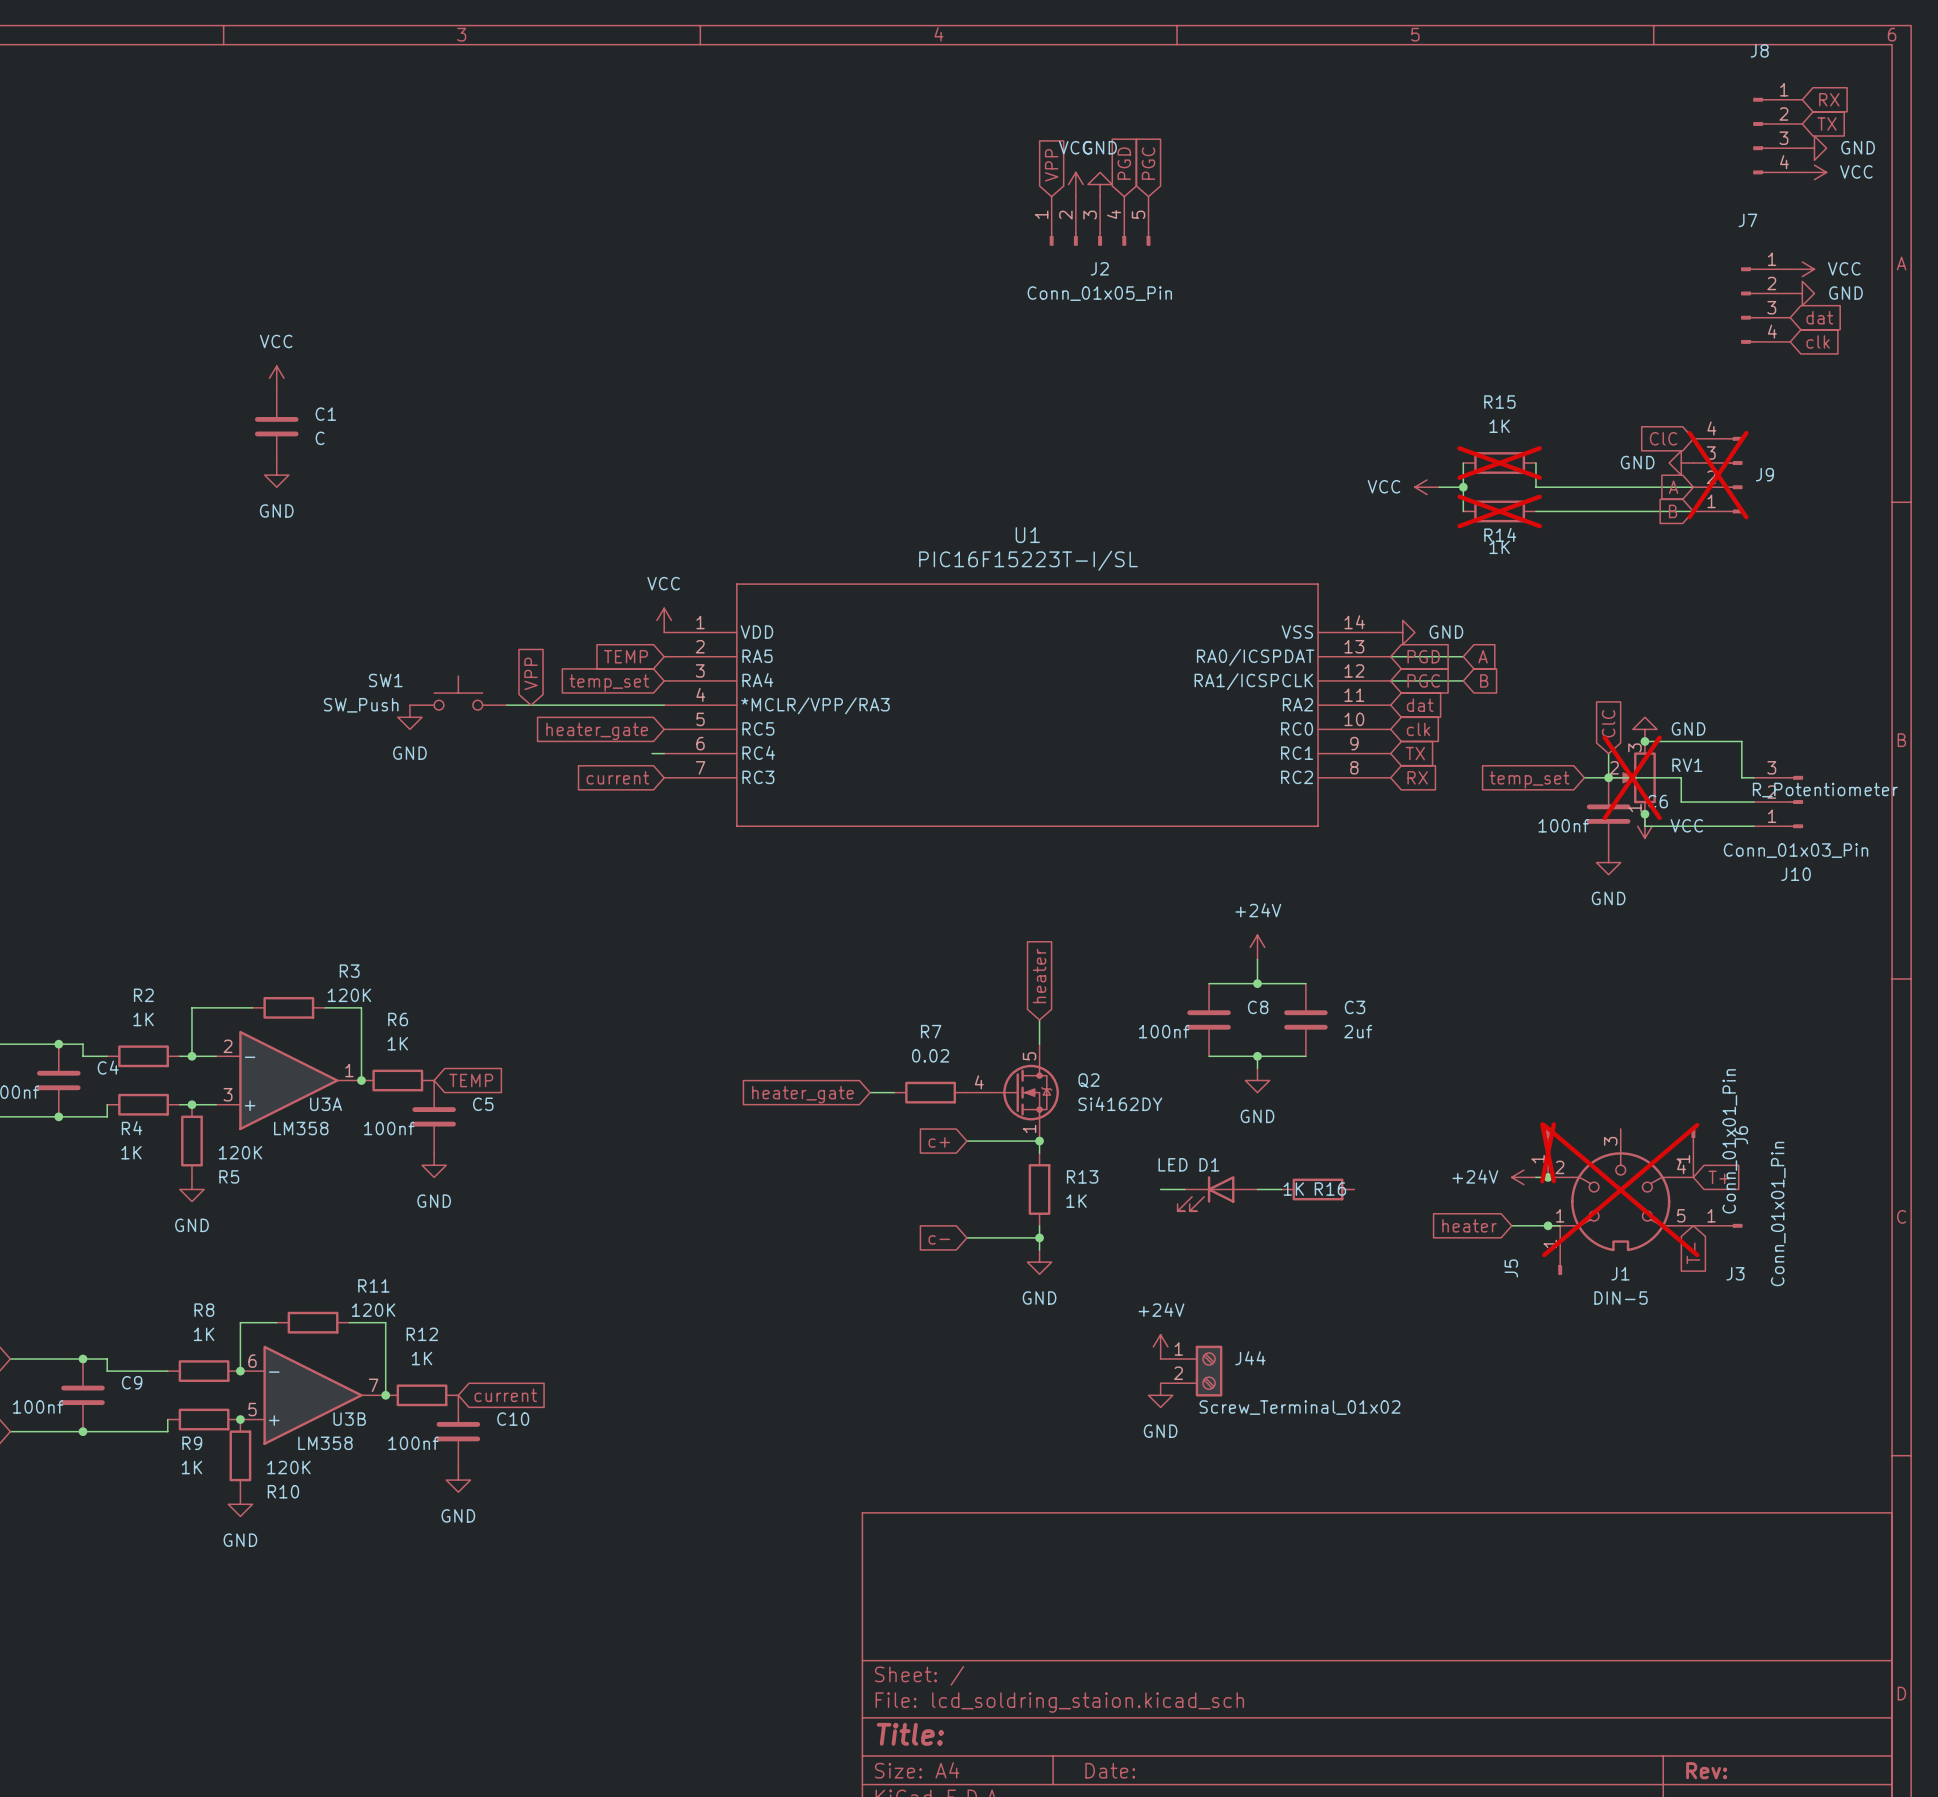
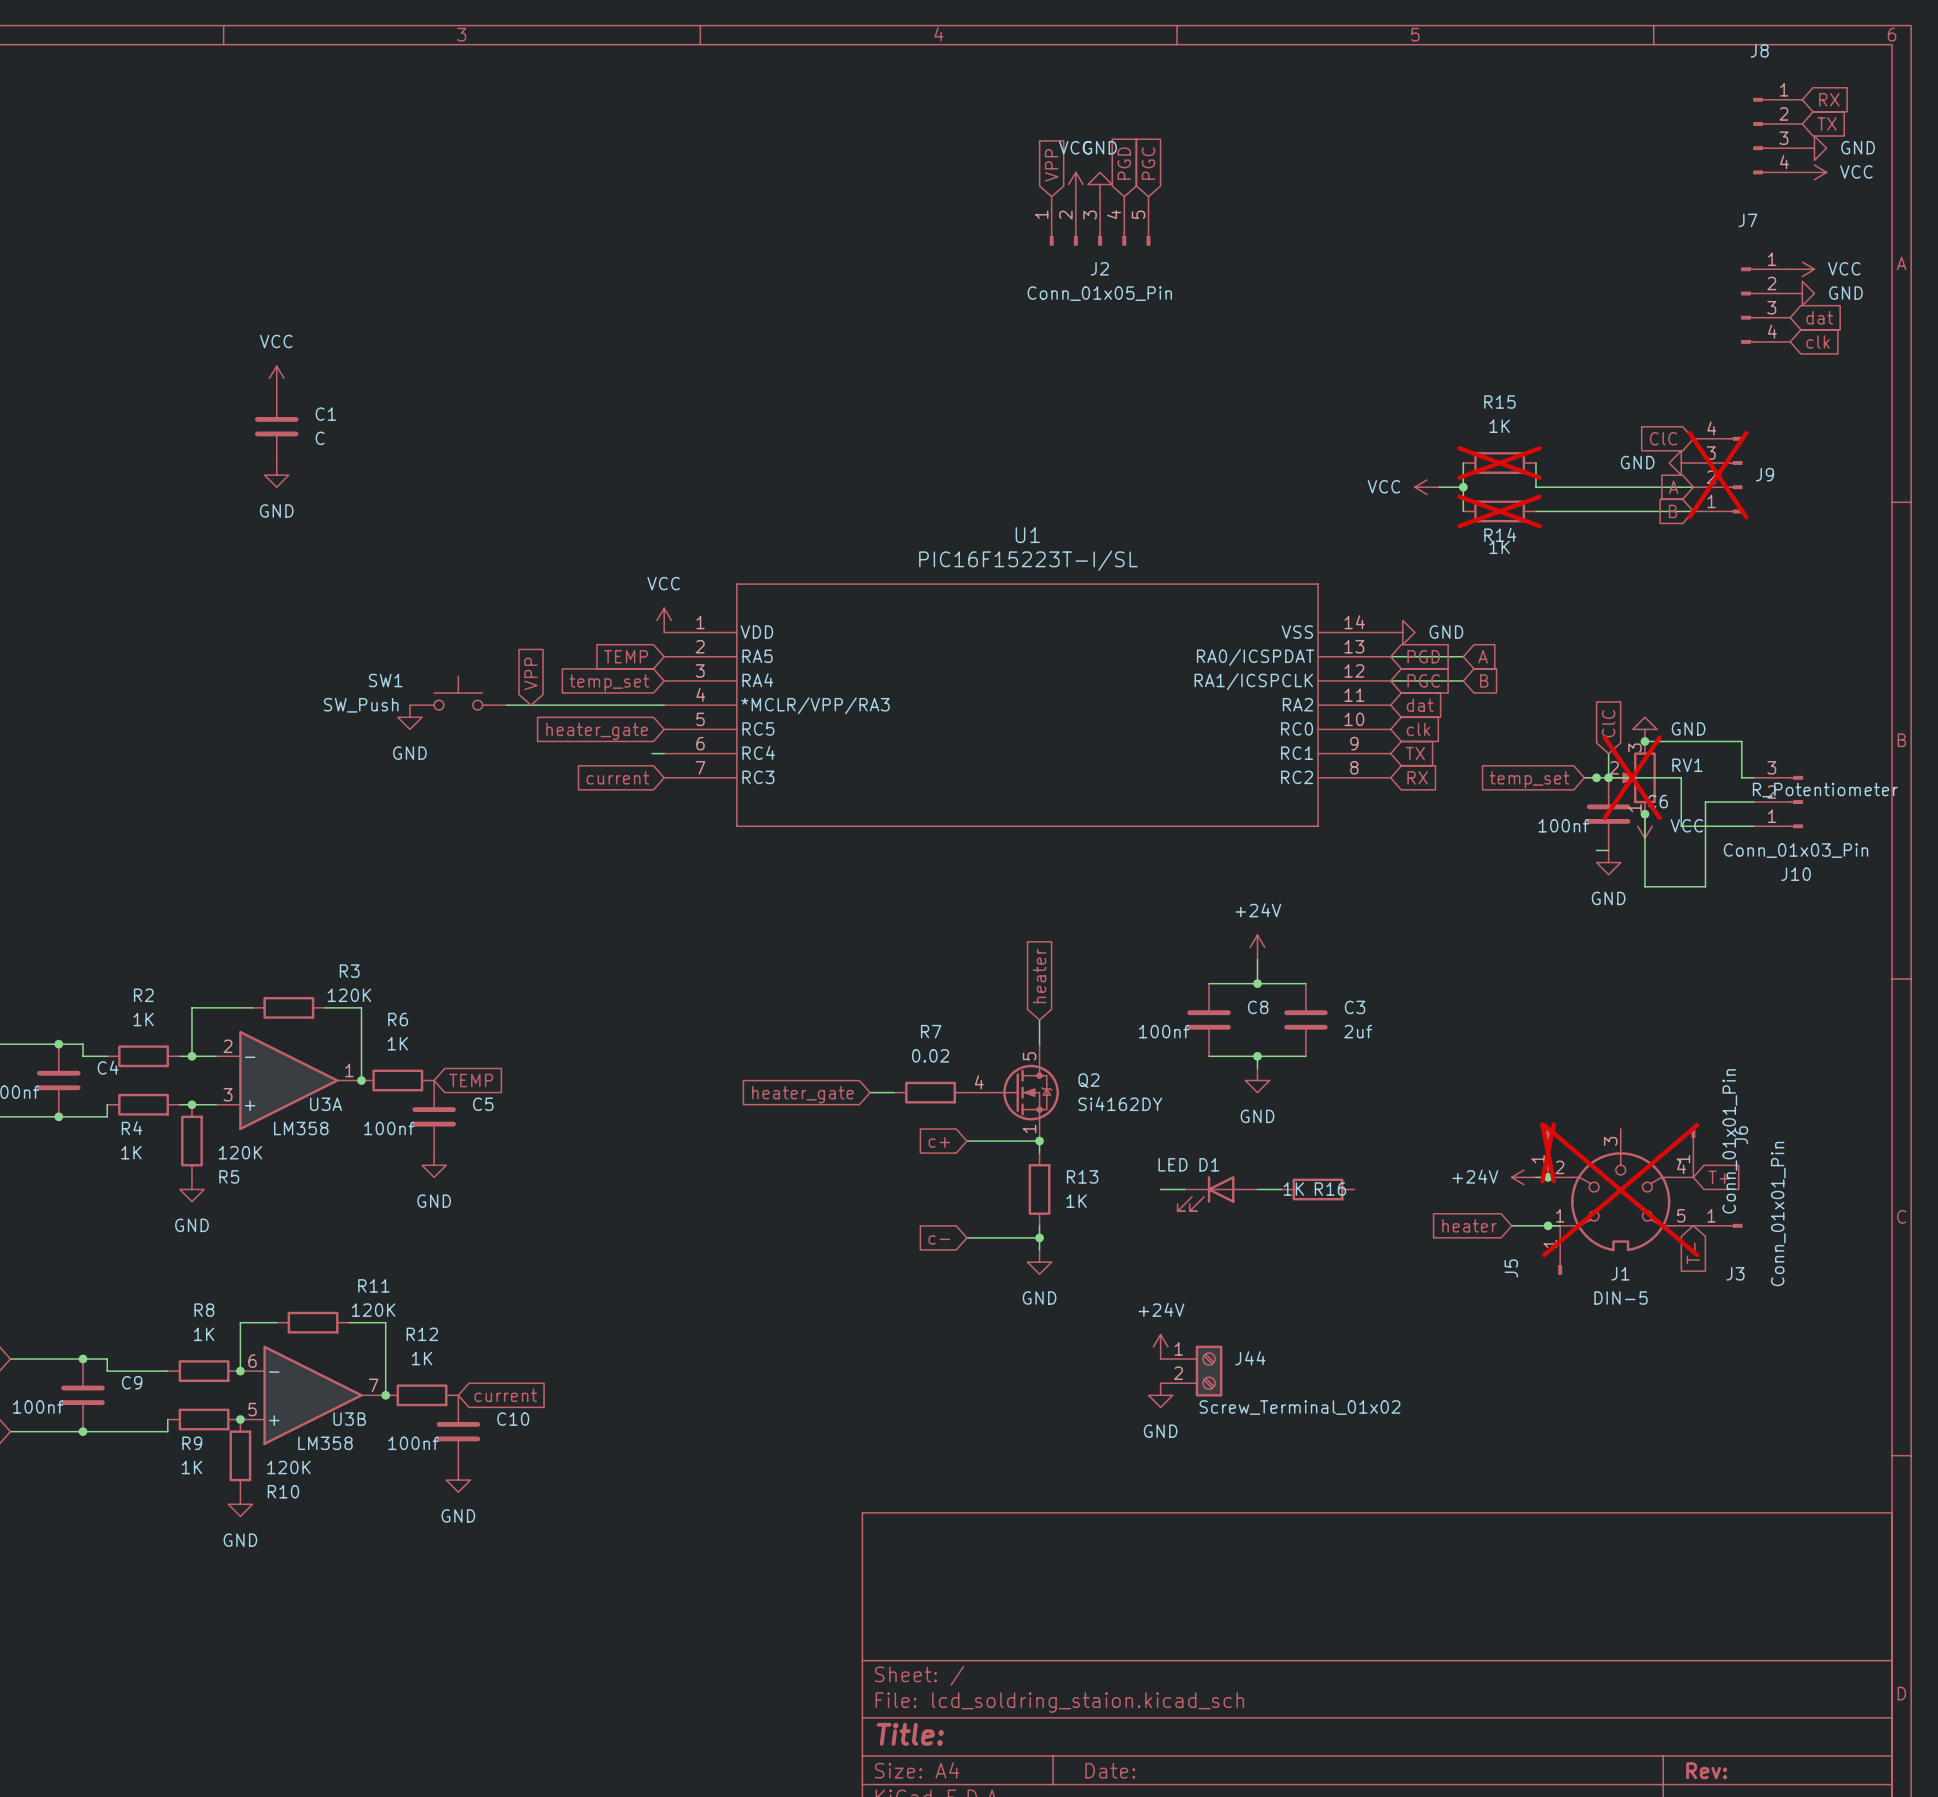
junction: none -> (1596, 777)
wire: (1681, 802) (1705, 802) -> (1681, 802) (1681, 826)
wire: (1644, 826) (1681, 826) -> (1644, 826) (1644, 886) (1705, 886) (1705, 802)
wire: none -> (1596, 850) (1608, 850)

